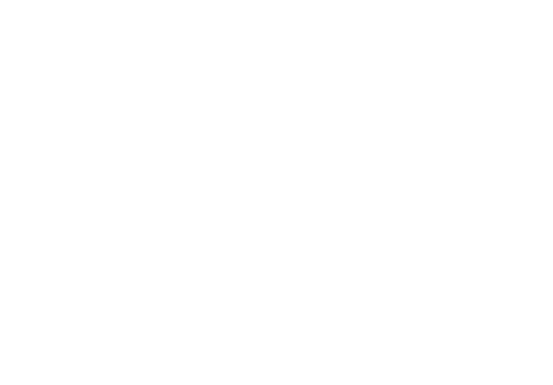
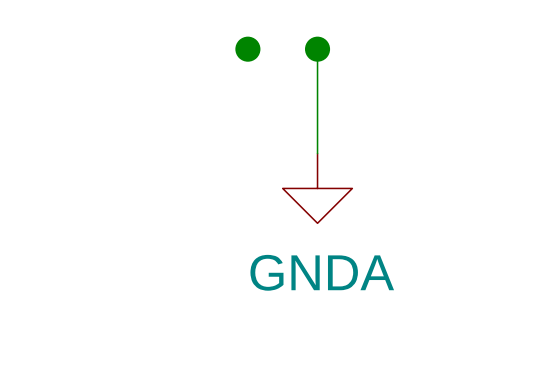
junction: none -> (247, 49)
wire: none -> (317, 49) (317, 153)
junction: none -> (317, 49)
power symbol: none -> GNDA (317, 188)

